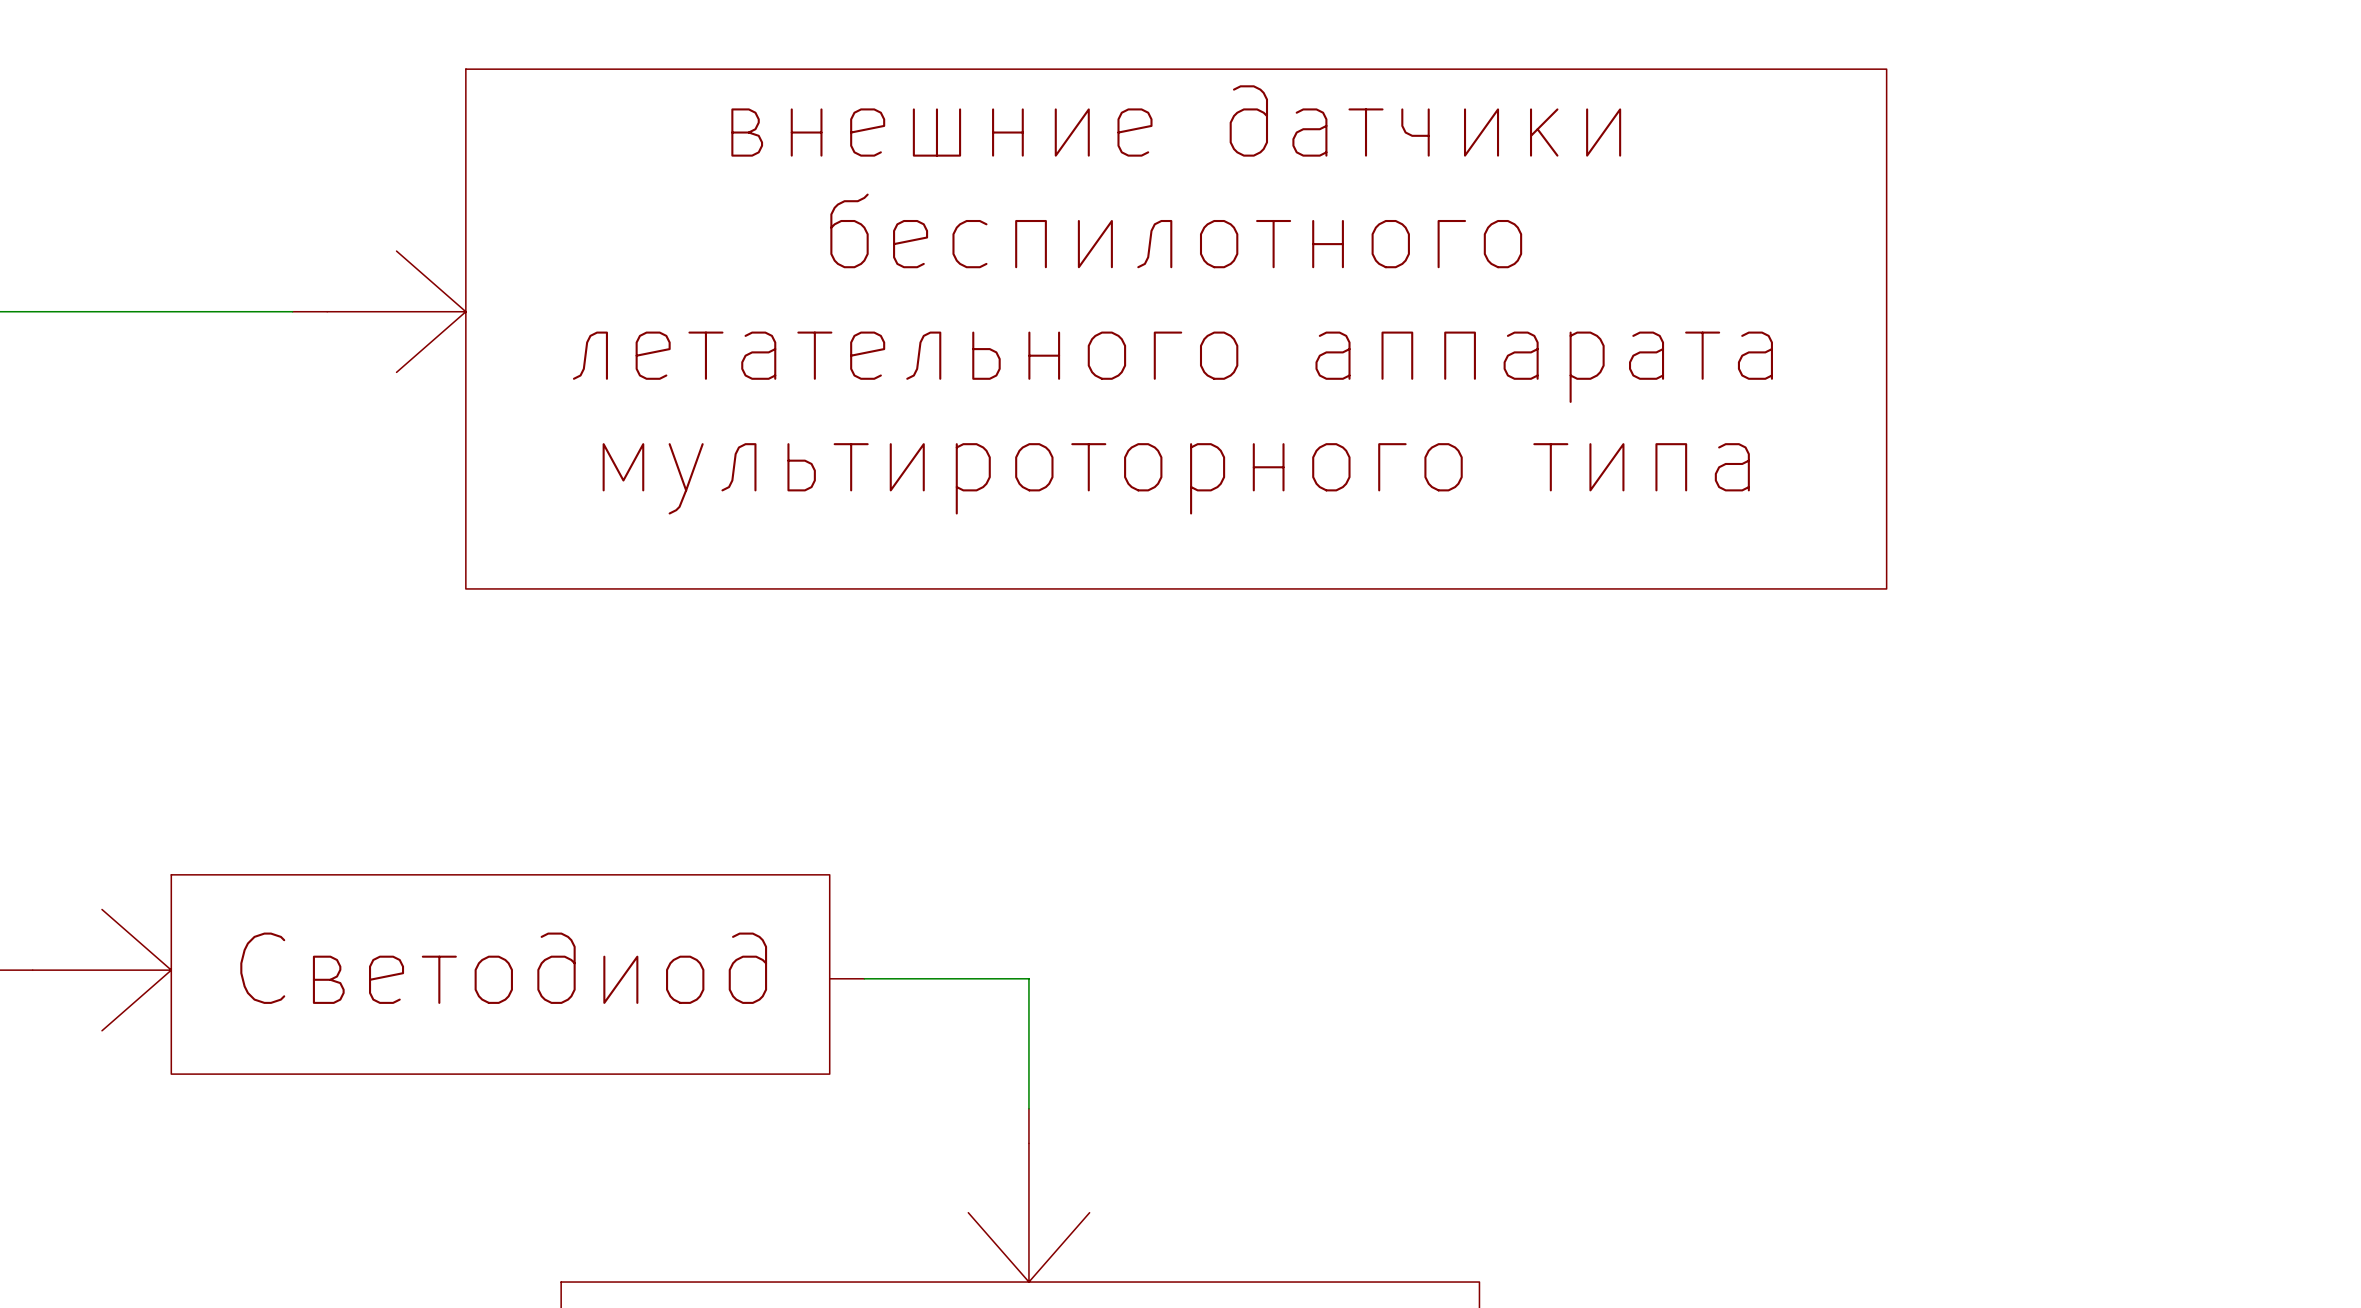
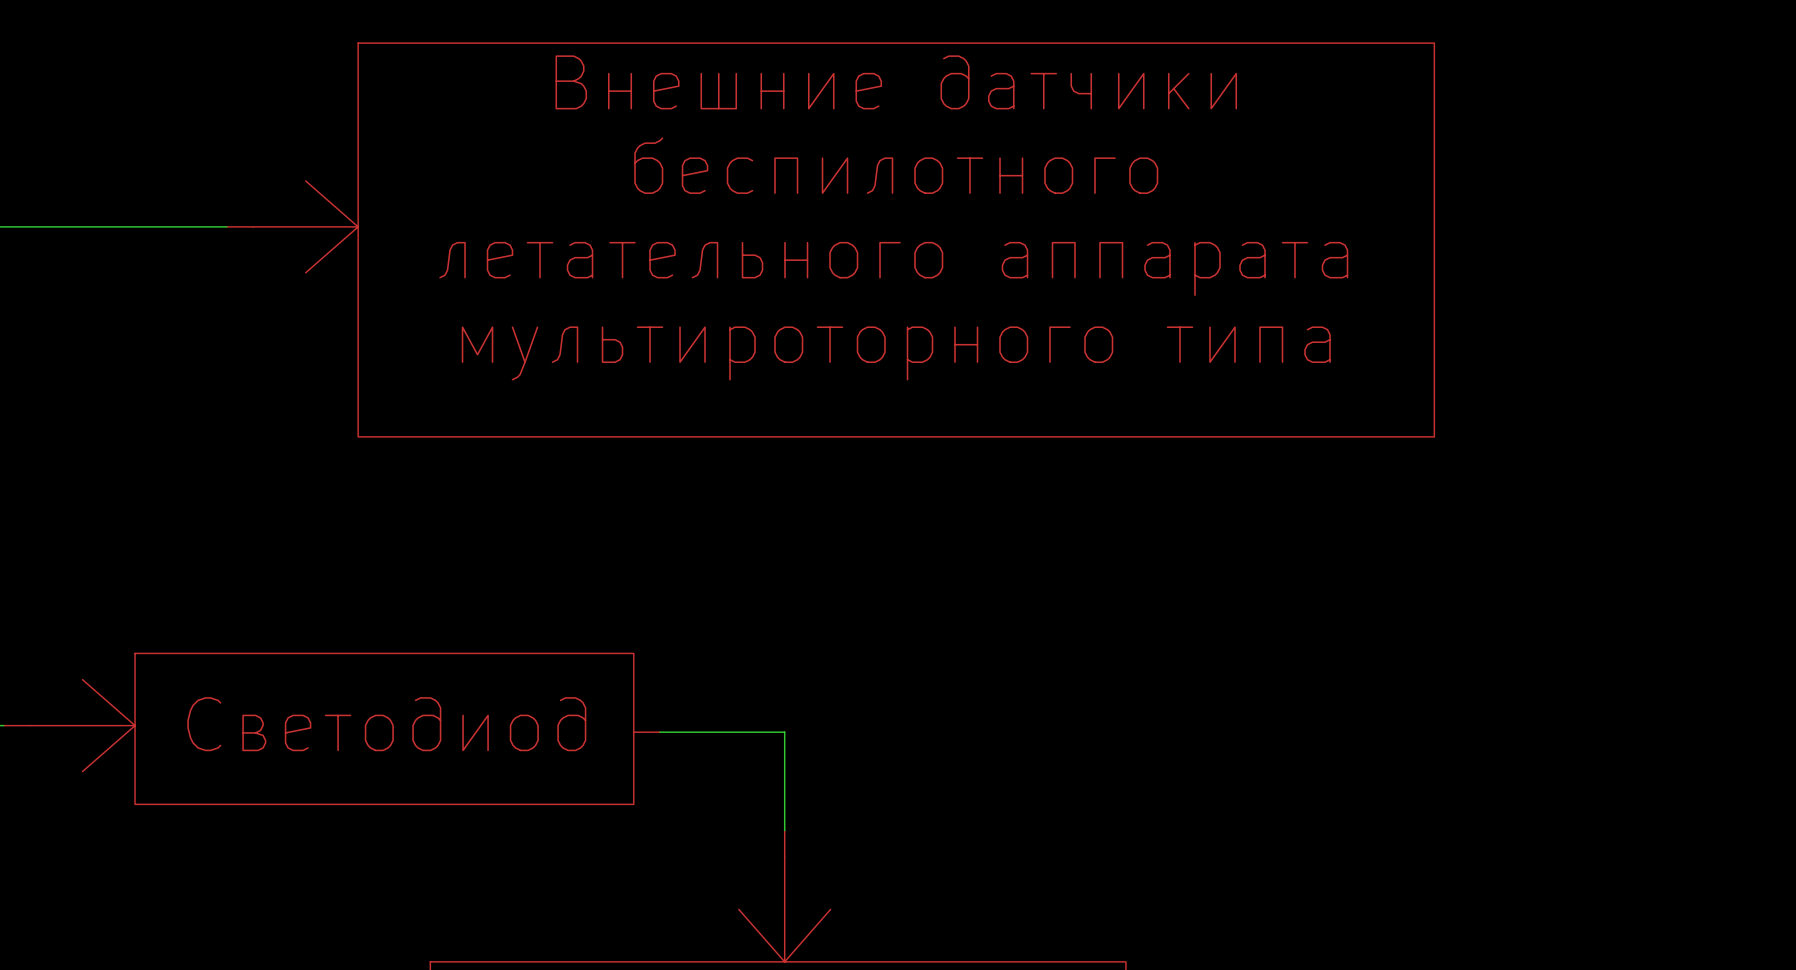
part text: внешние датчики (1176, 120) -> Внешние датчики (896, 82)

